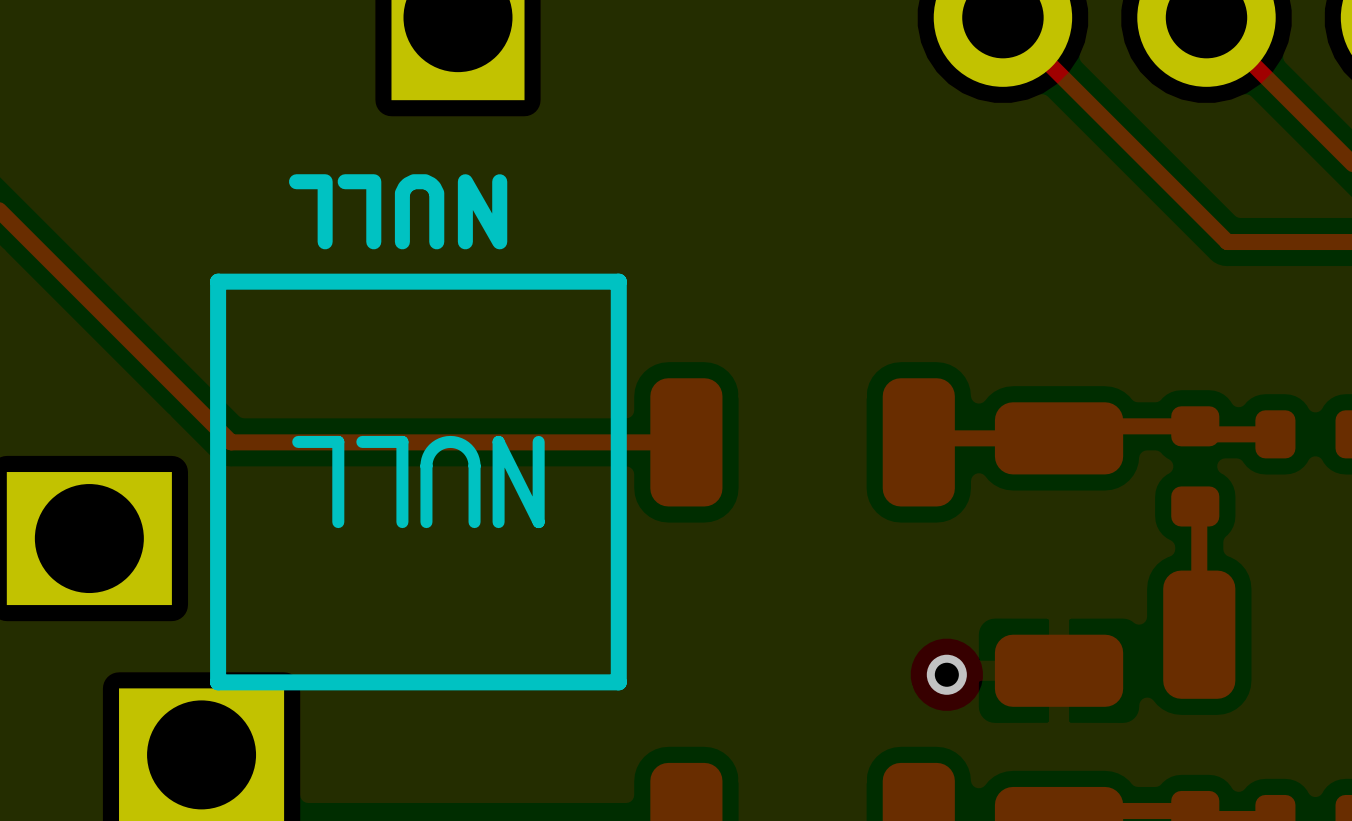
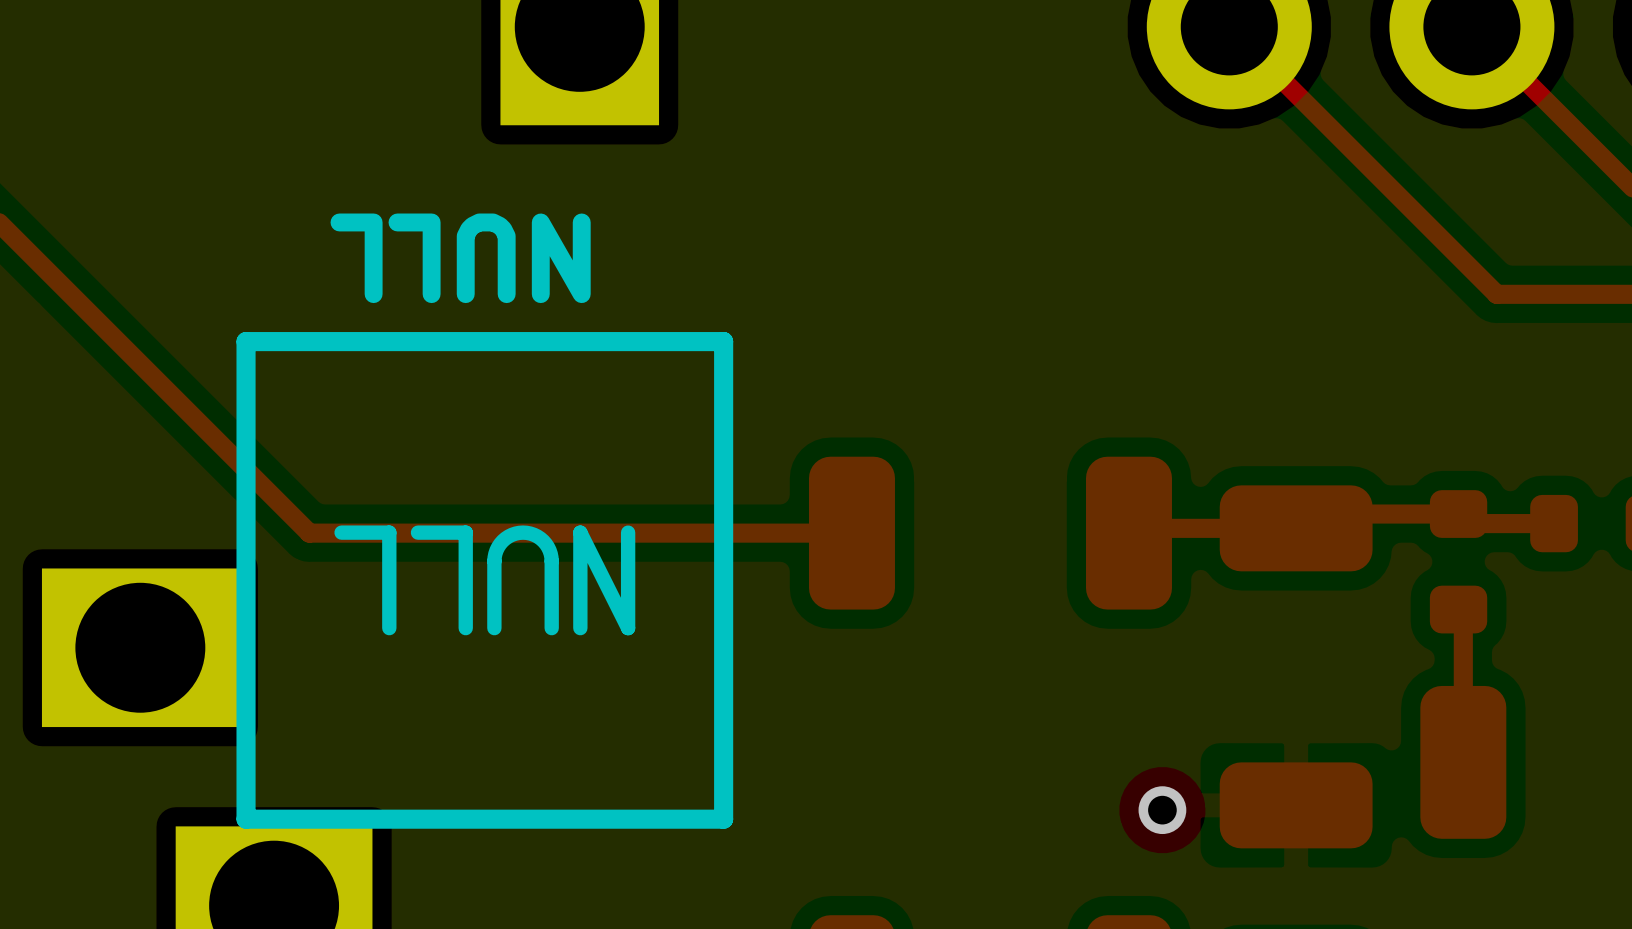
text position: NULL (398, 211) -> NULL (460, 258)
drawing position: (418, 482) -> (484, 580)

